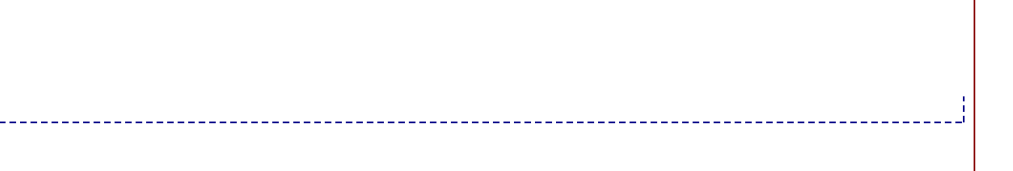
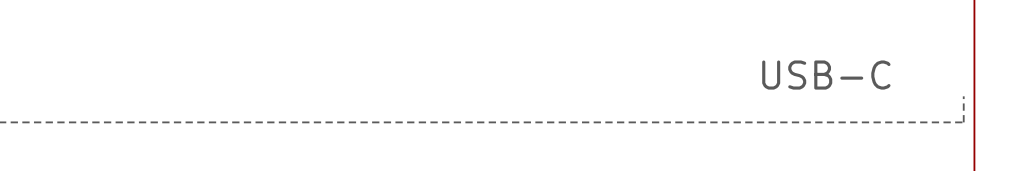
text: none -> USB-C (826, 75)

